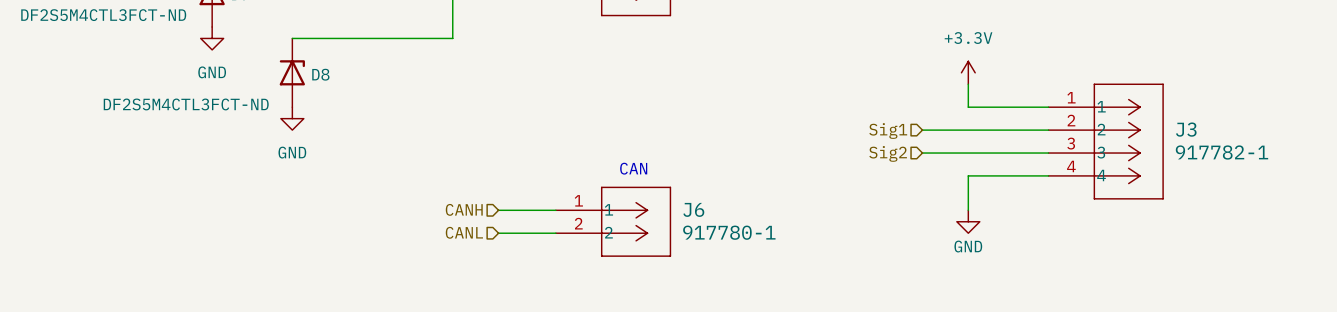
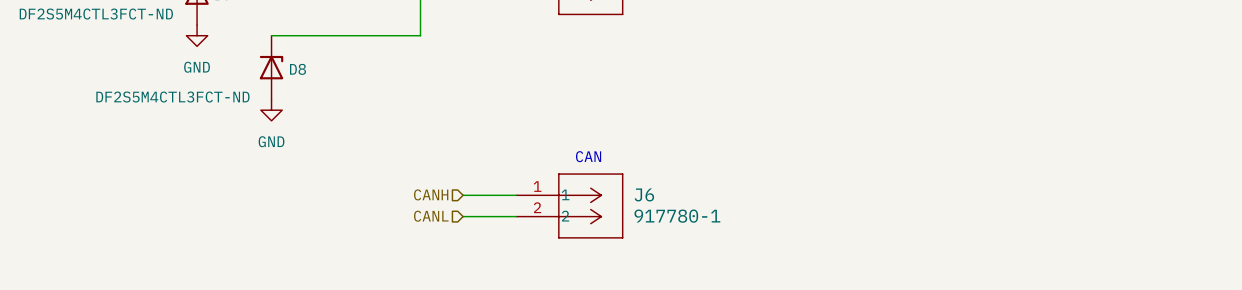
power symbol: +3.3V (968, 72) -> none
wire: (968, 84) (968, 107) (1048, 107) -> none
wire: (922, 130) (1048, 130) -> none
hierarchical label: Sig1 (888, 131) -> none
J3: 917782-1 (1106, 141) -> none
hierarchical label: Sig2 (888, 153) -> none
wire: (922, 153) (1048, 153) -> none
wire: (1048, 175) (968, 175) (968, 210) -> none
power symbol: GND (968, 221) -> none

